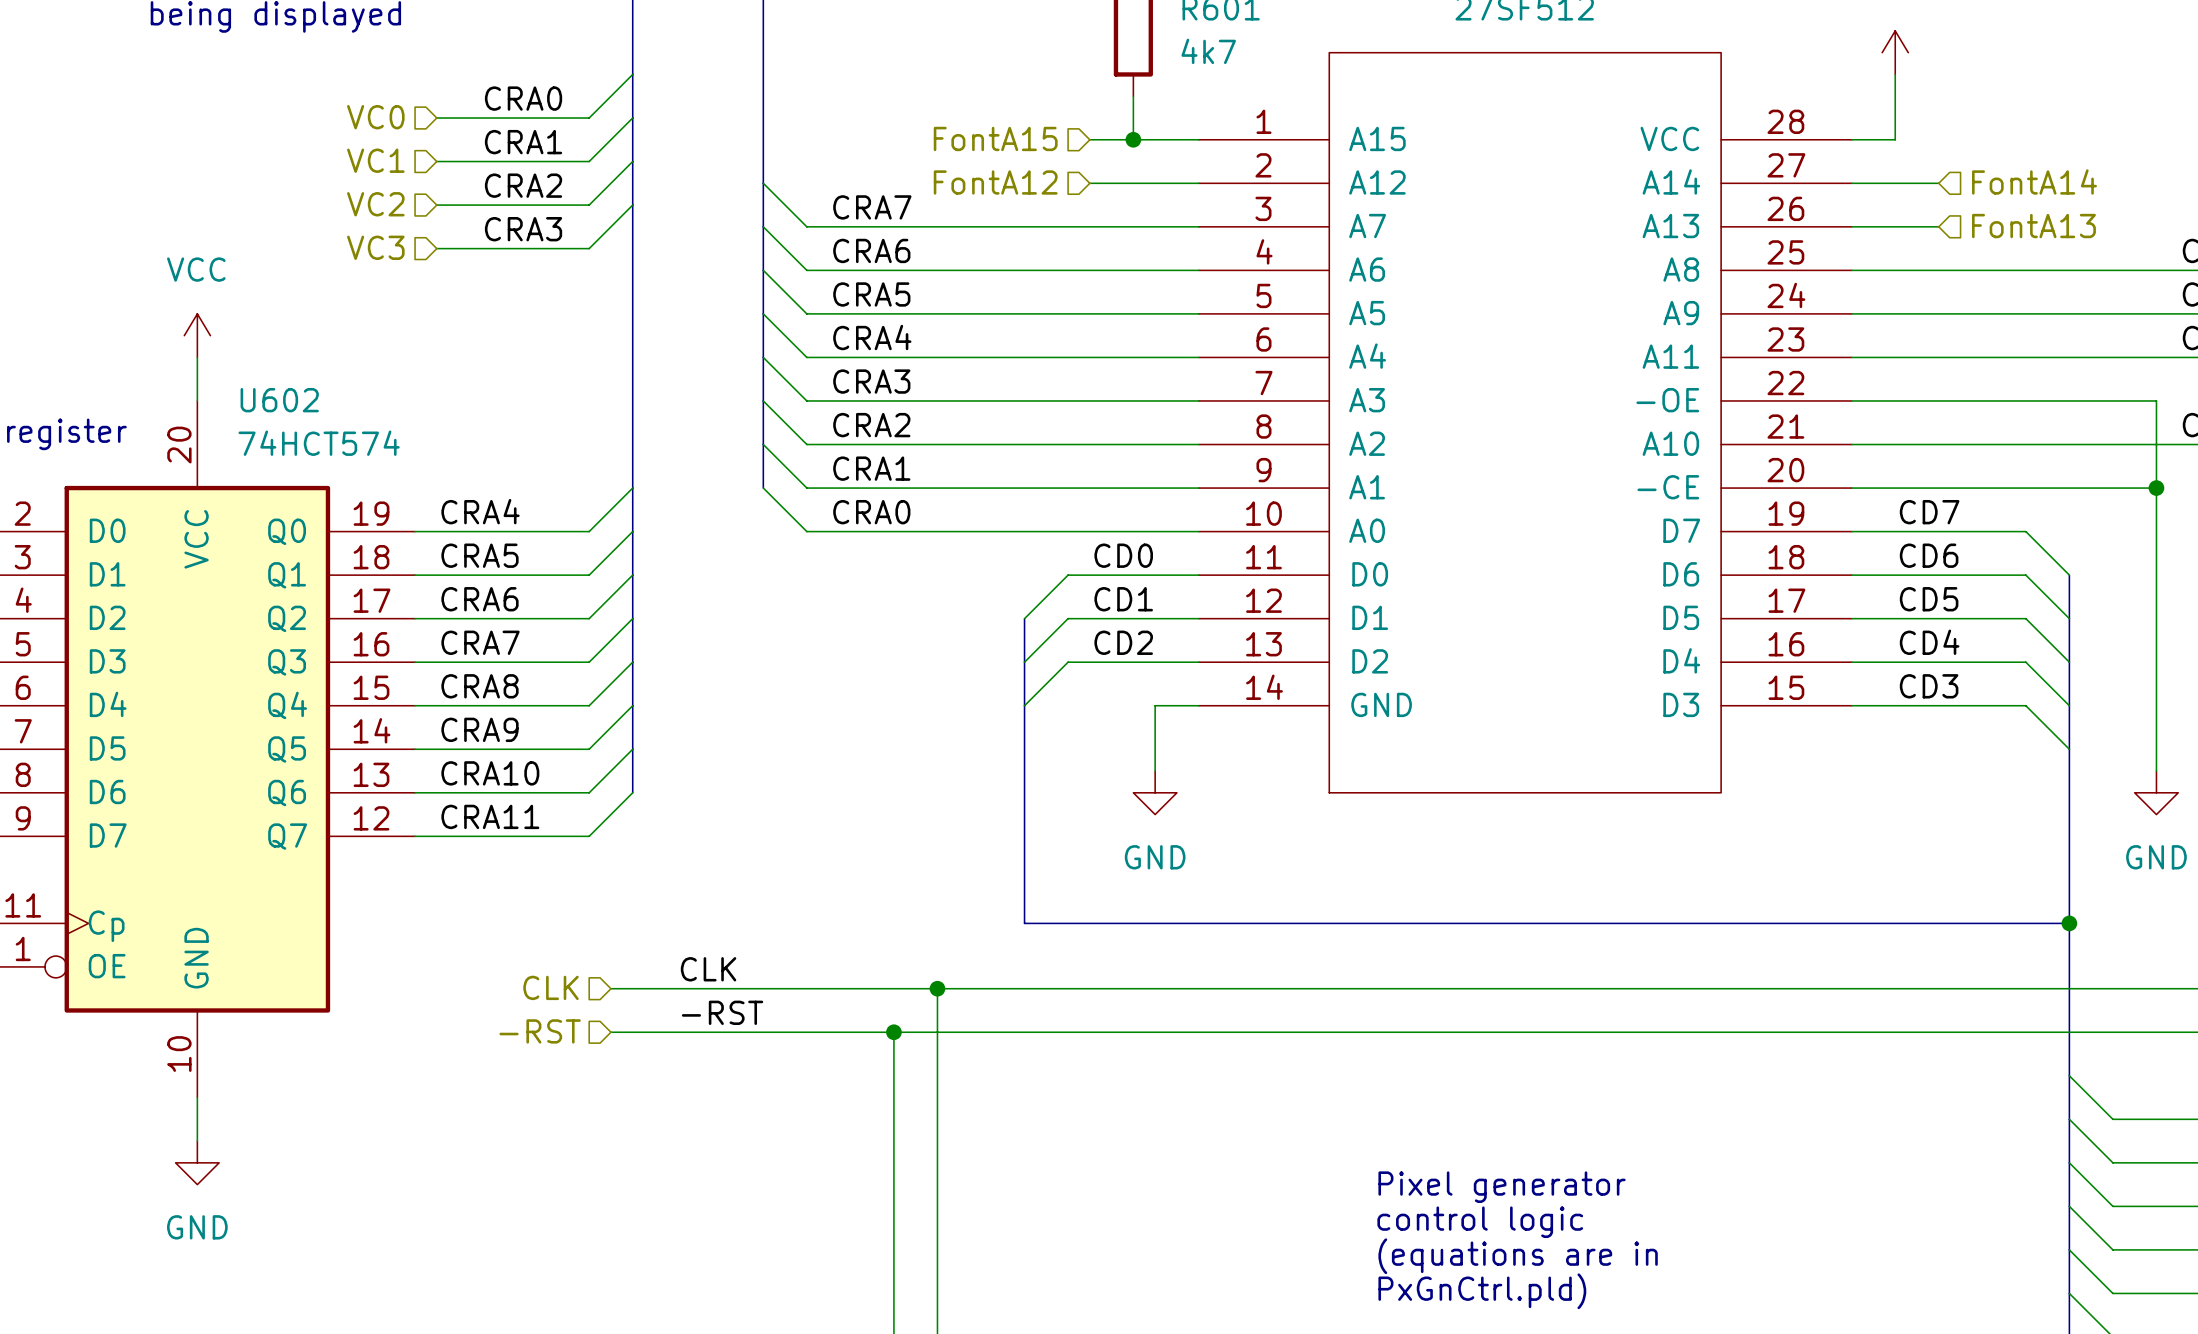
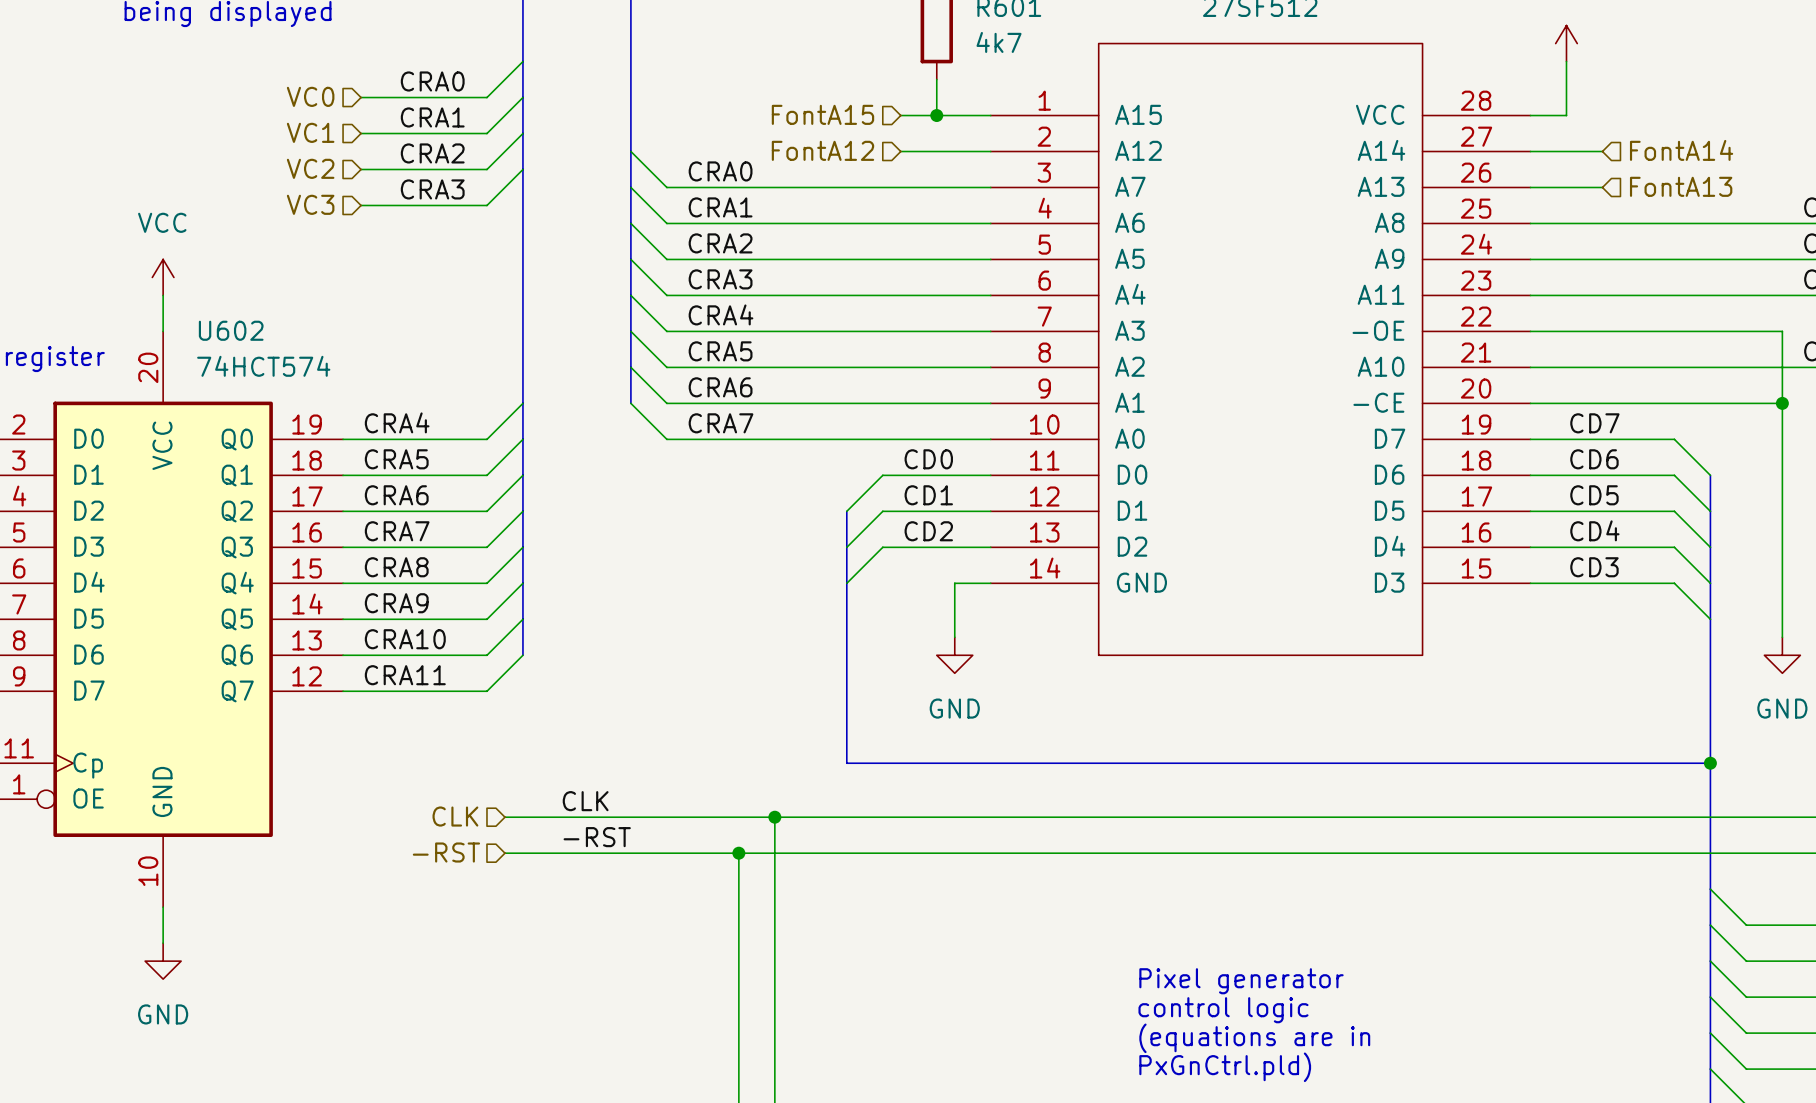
label: CRA7 (872, 207) -> CRA0 (720, 171)
label: CRA6 (871, 250) -> CRA1 (720, 207)
label: CRA5 (871, 294) -> CRA2 (720, 243)
label: CRA4 (872, 337) -> CRA3 (720, 279)
label: CRA3 (871, 381) -> CRA4 (721, 314)
label: CRA2 (871, 425) -> CRA5 (720, 351)
label: CRA1 (871, 468) -> CRA6 (720, 387)
label: CRA0 (871, 512) -> CRA7 (721, 423)

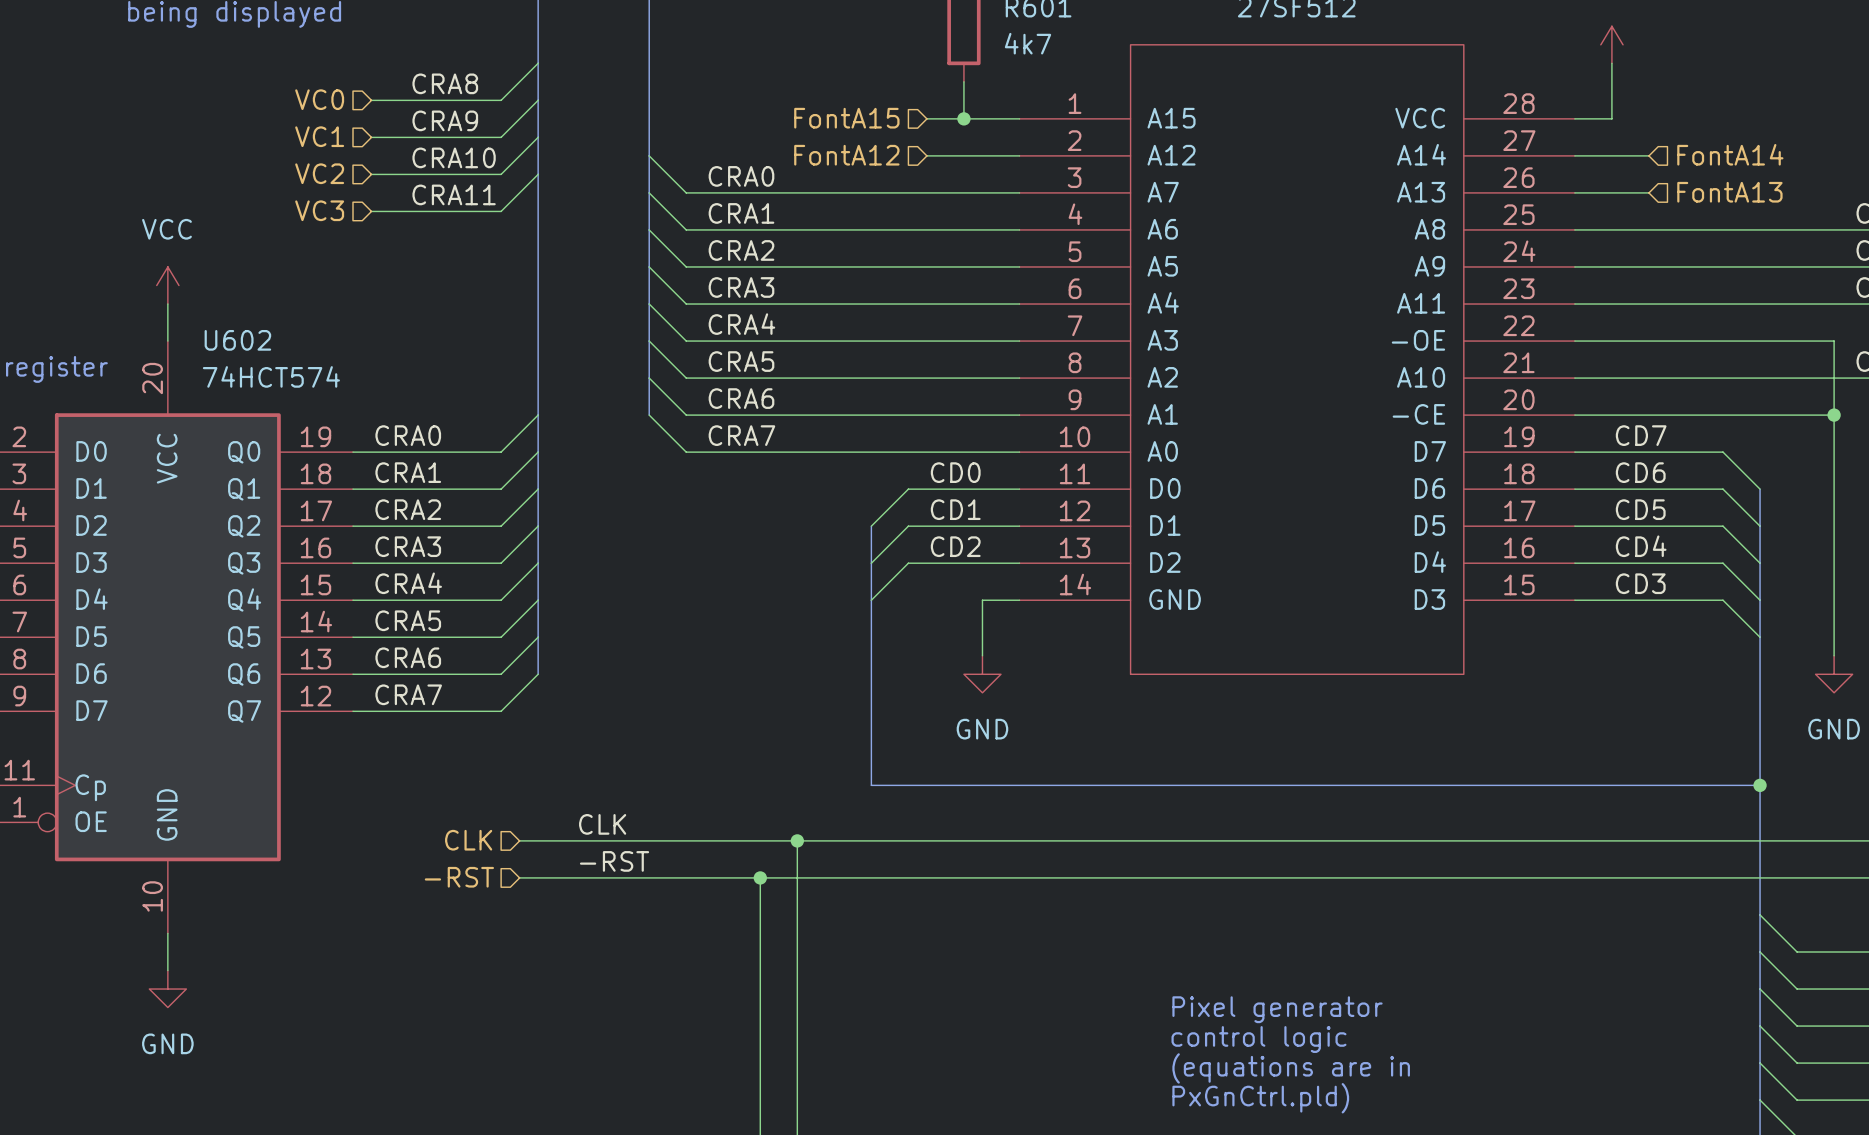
label: CRA0 (432, 81) -> CRA8 (445, 83)
label: CRA1 (432, 117) -> CRA9 (445, 120)
label: CRA2 (432, 153) -> CRA10 (454, 157)
label: CRA3 (432, 189) -> CRA11 (454, 194)
label: CRA4 (397, 422) -> CRA0 (408, 435)
label: CRA5 (396, 459) -> CRA1 (408, 472)
label: CRA6 (396, 495) -> CRA2 (408, 509)
label: CRA7 (397, 531) -> CRA3 (408, 546)
label: CRA8 (396, 567) -> CRA4 (408, 583)
label: CRA9 (396, 603) -> CRA5 (408, 620)
label: CRA10 (405, 639) -> CRA6 (408, 657)
label: CRA11 (405, 675) -> CRA7 (408, 694)

